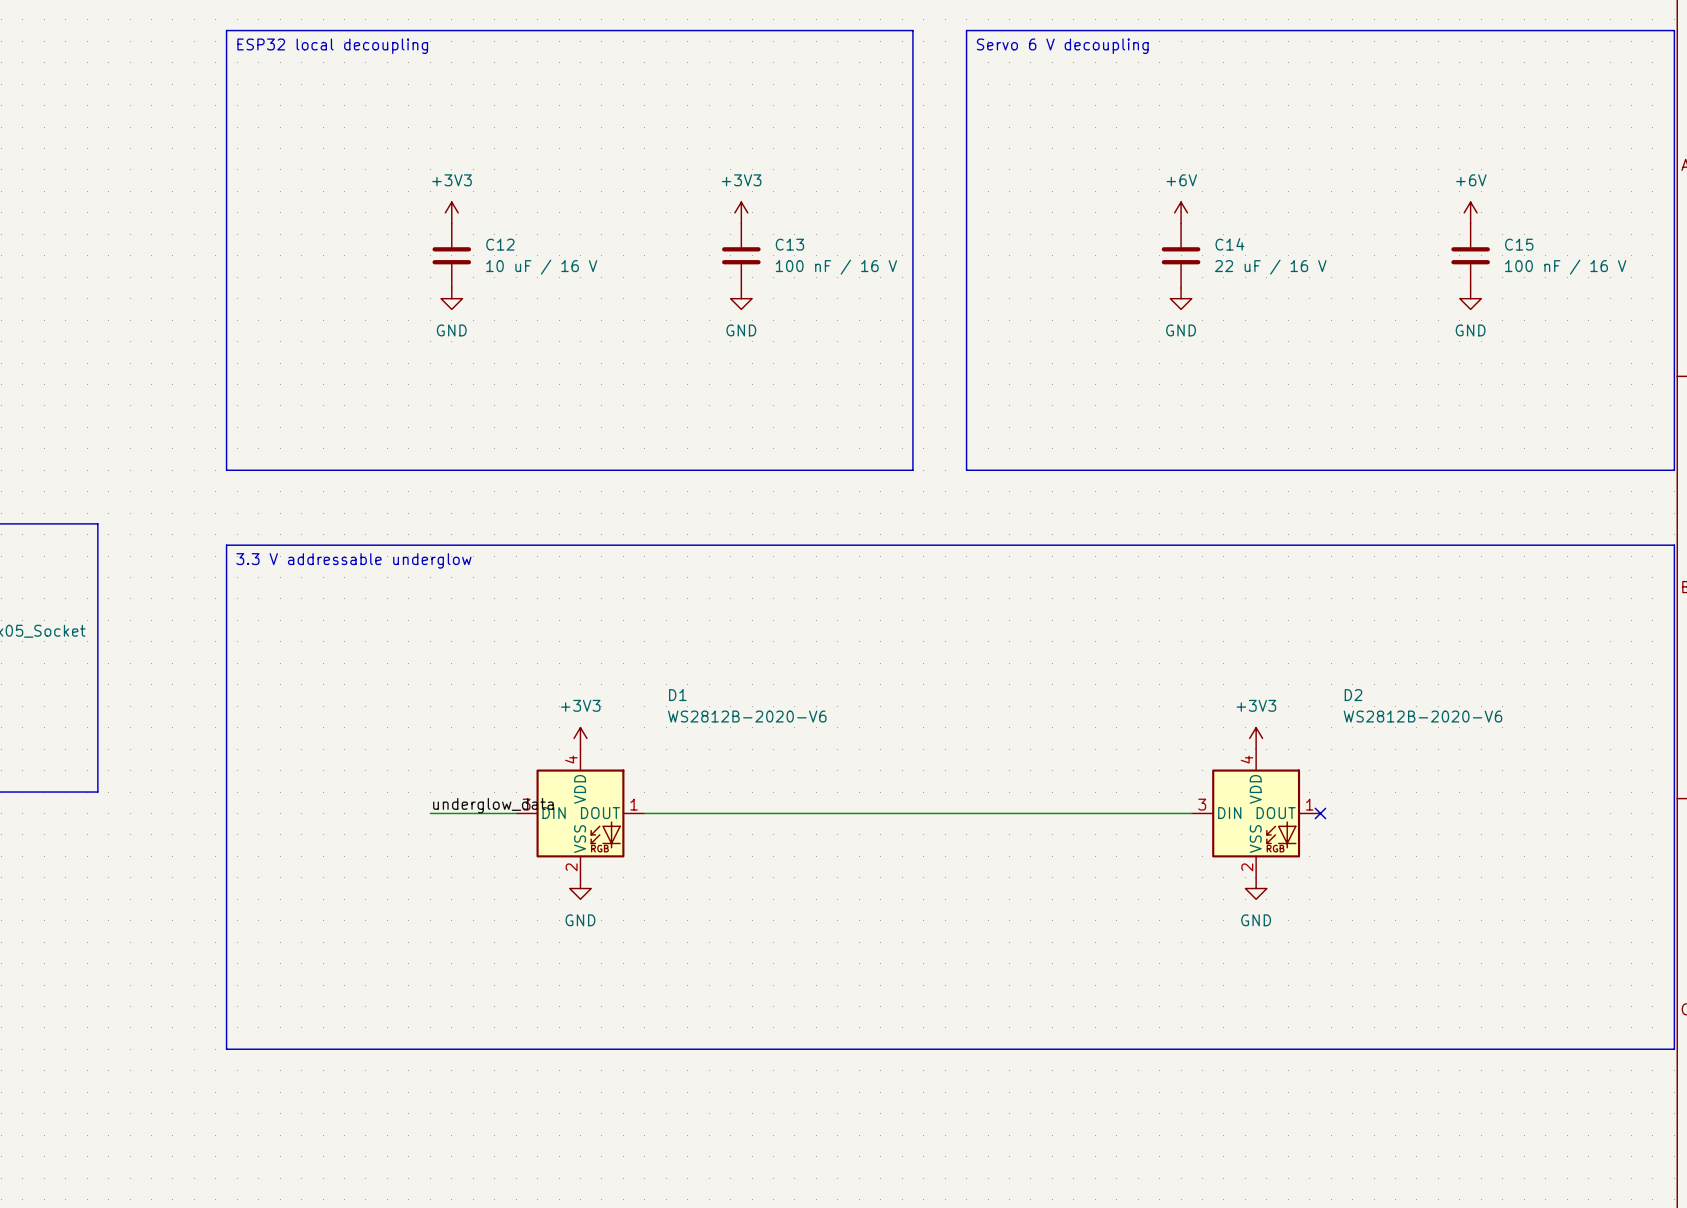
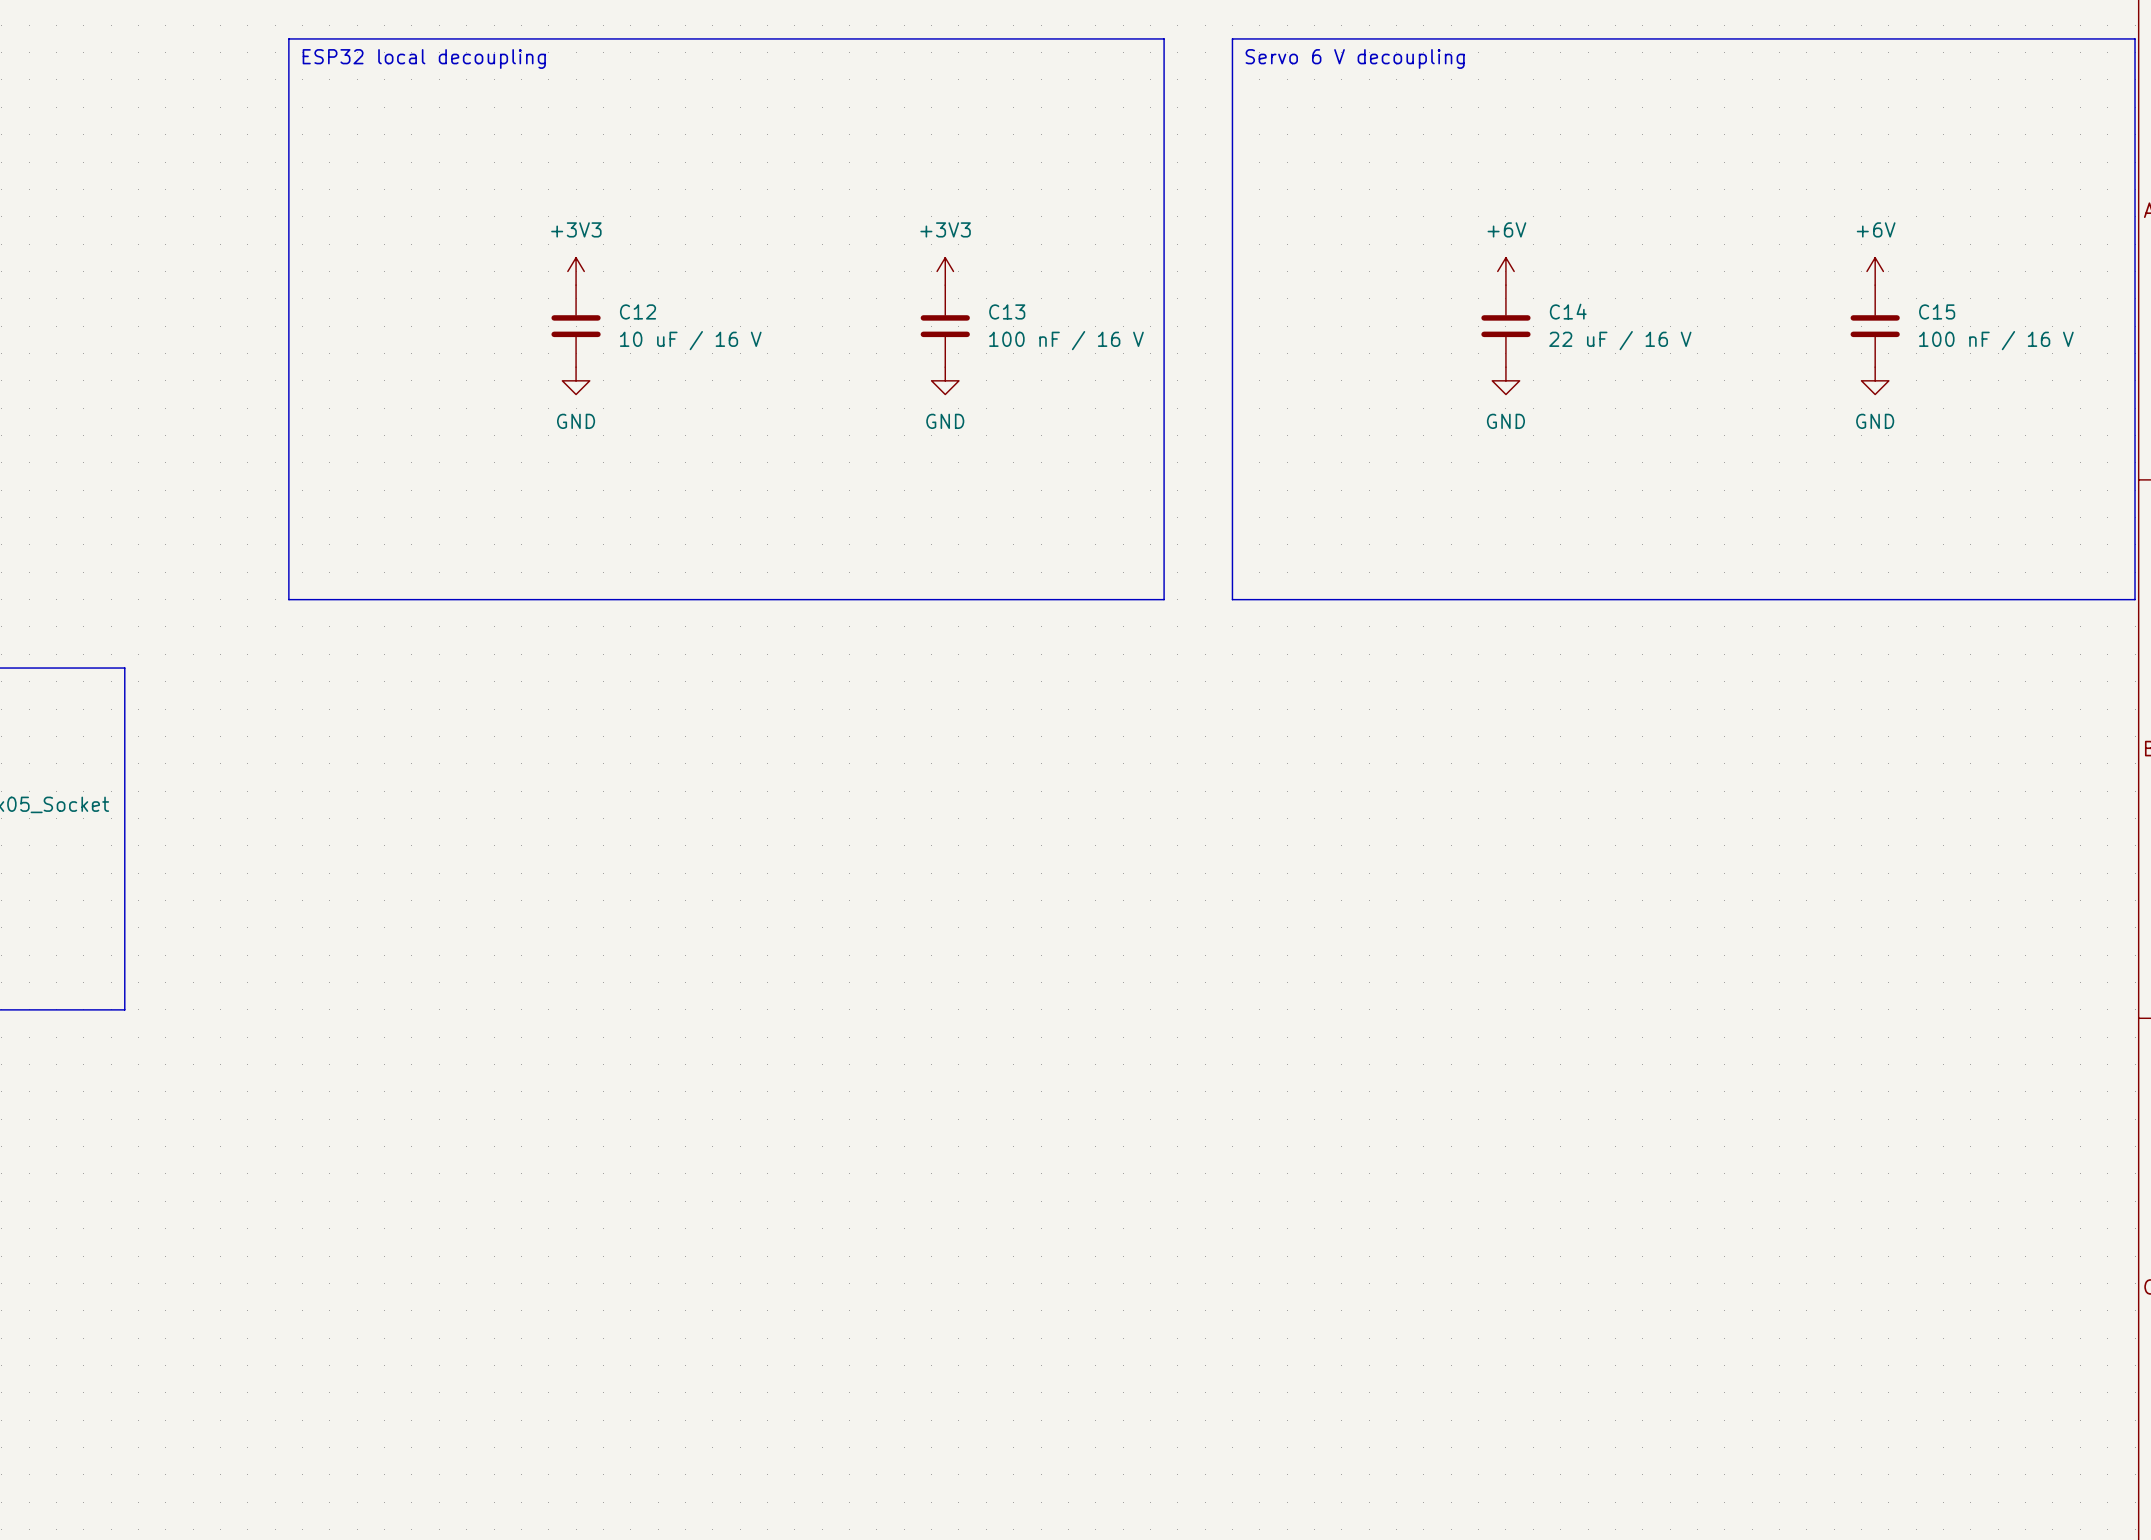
line: (226, 545) (1674, 545) (1674, 1049) (226, 1049) (226, 545) -> none
text: 3.3 V addressable underglow (353, 560) -> none
power symbol: +3V3 (580, 738) -> none
power symbol: +3V3 (1256, 738) -> none
label: underglow_data (493, 805) -> none
wire: (430, 813) (516, 813) -> none
D1: WS2812B-2020-V6 (580, 813) -> none
wire: (644, 813) (1191, 813) -> none
D2: WS2812B-2020-V6 (1256, 813) -> none
no-connect mark: (1320, 813) -> none
power symbol: GND (580, 888) -> none
power symbol: GND (1256, 888) -> none

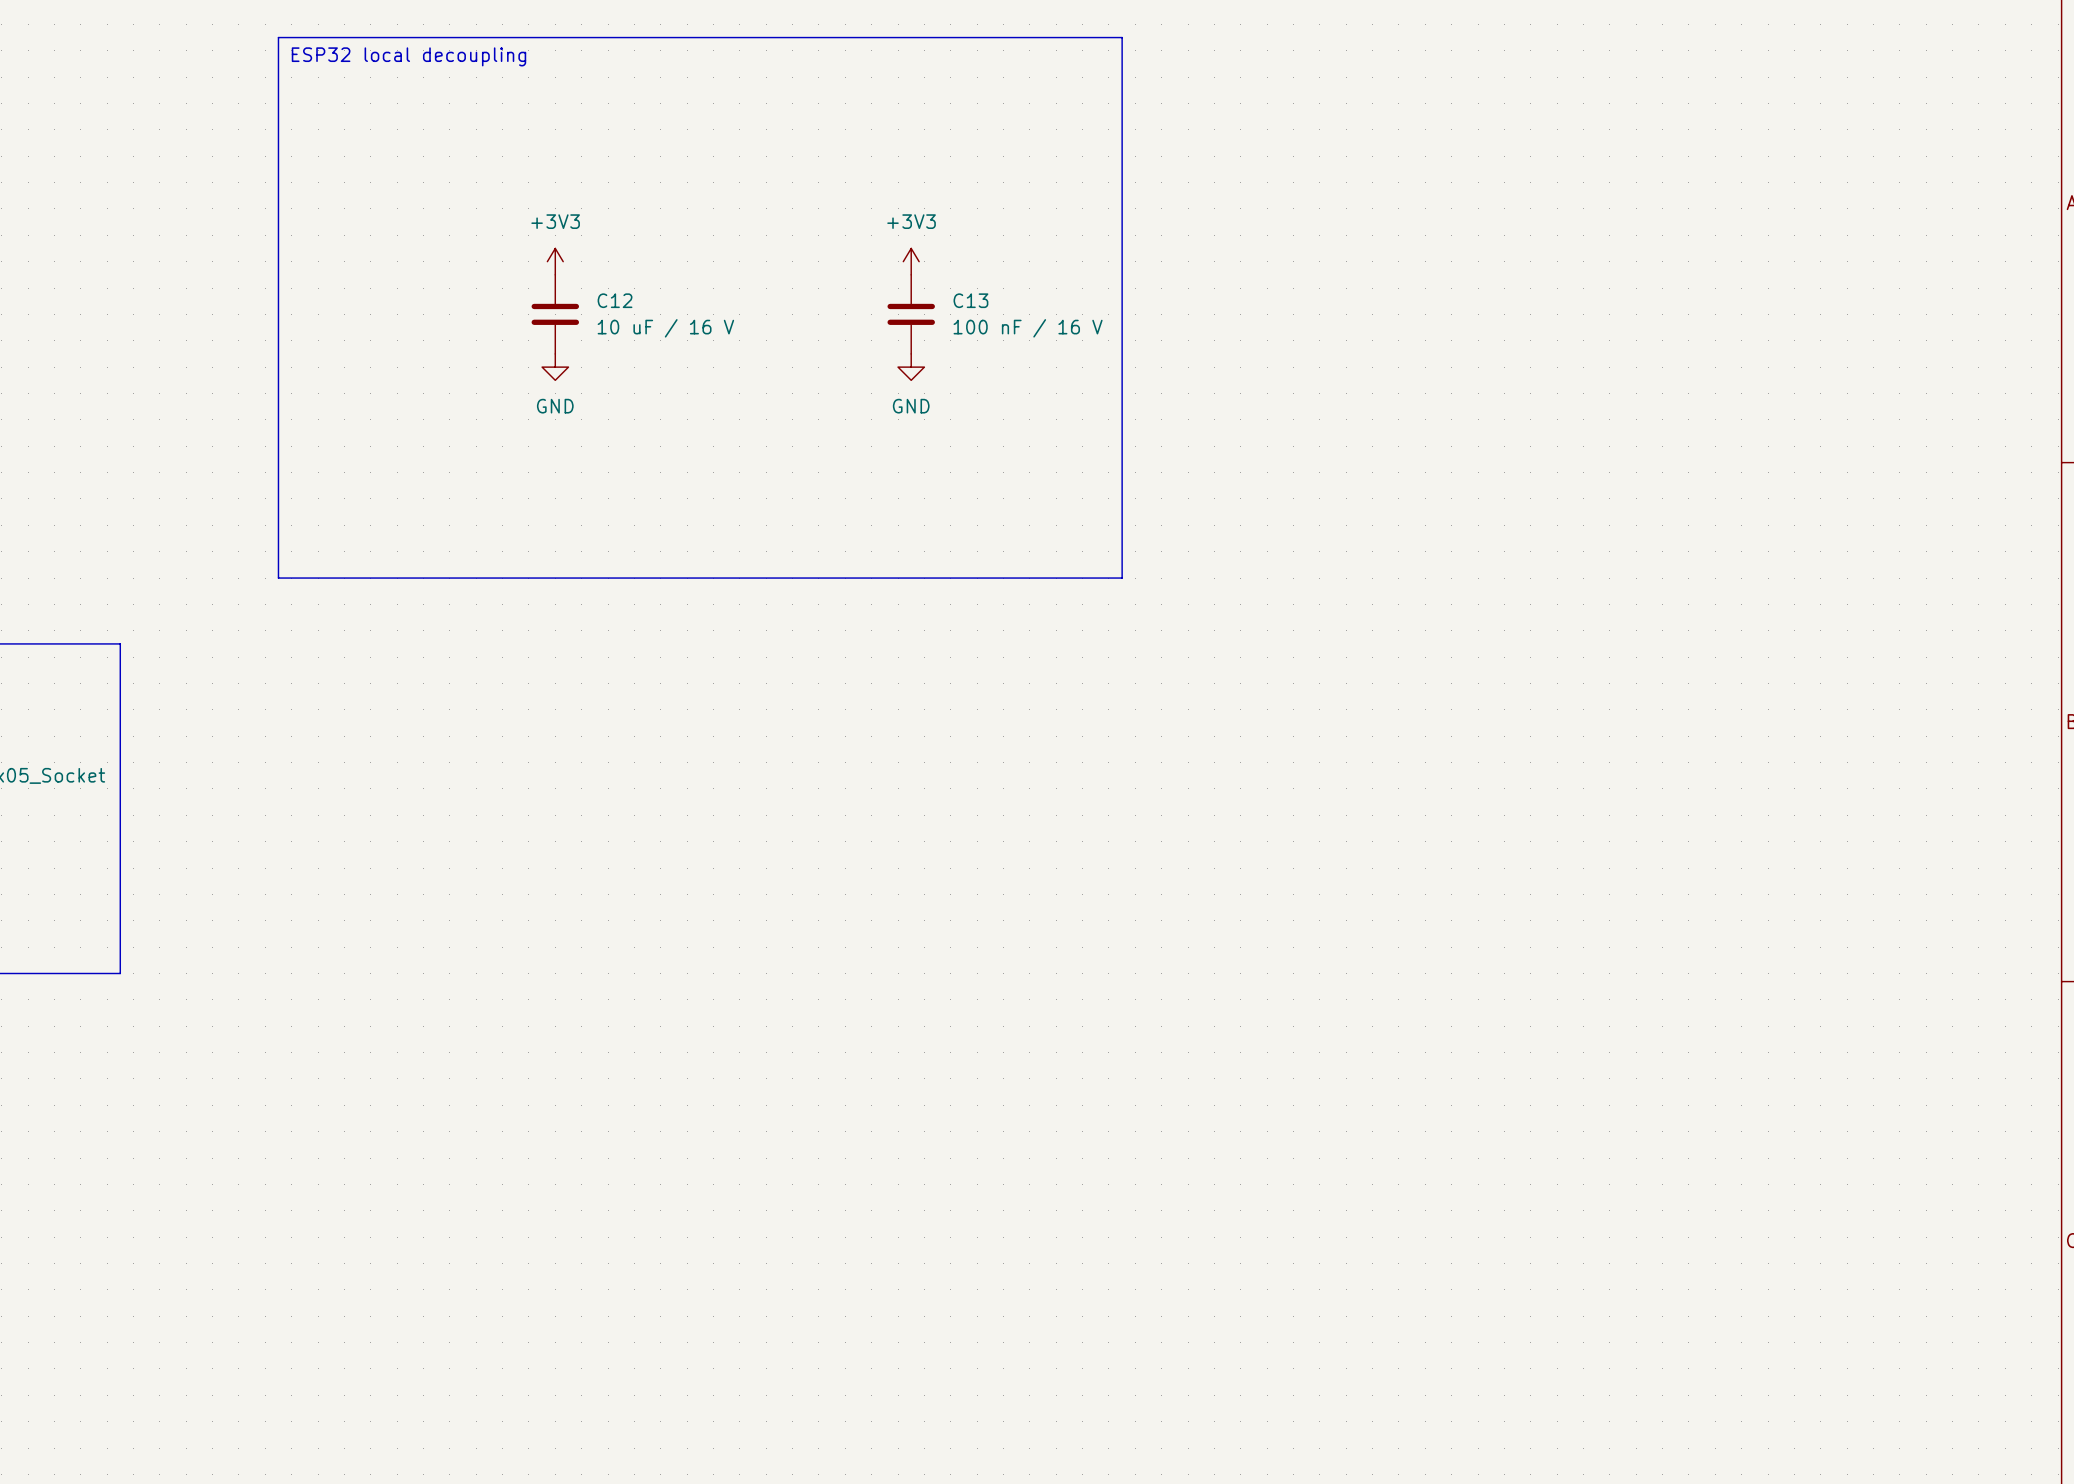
line: (1232, 38) (2135, 38) (2135, 599) (1232, 599) (1232, 38) -> none
text: Servo 6 V decoupling (1355, 58) -> none
power symbol: +6V (1505, 271) -> none
power symbol: +6V (1875, 271) -> none
C14: 22 uF / 16 V (1505, 326) -> none
C15: 100 nF / 16 V (1875, 326) -> none
power symbol: GND (1505, 380) -> none
power symbol: GND (1875, 380) -> none

